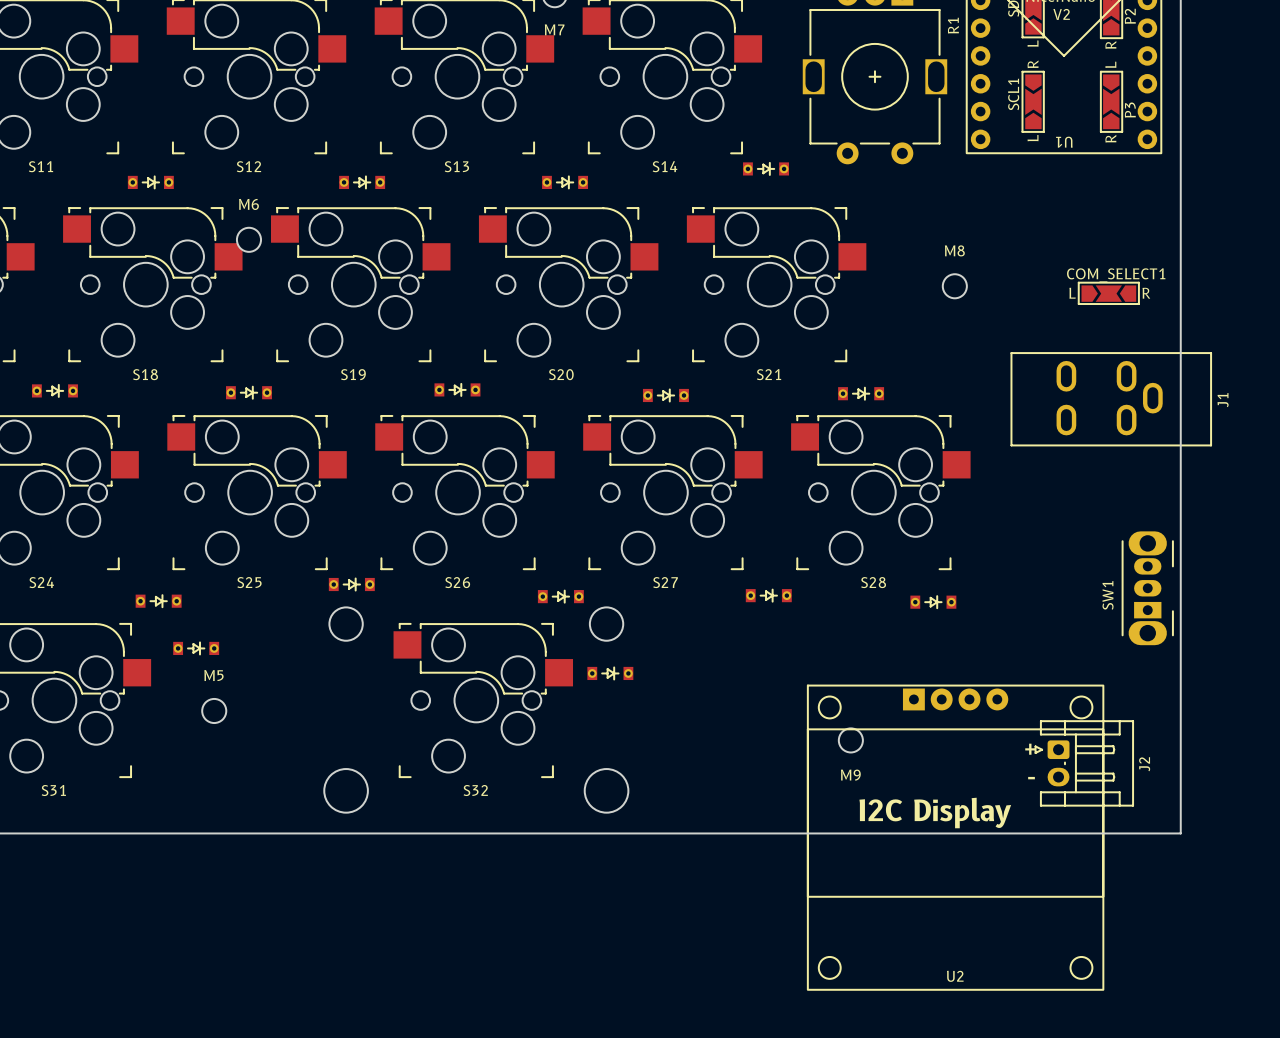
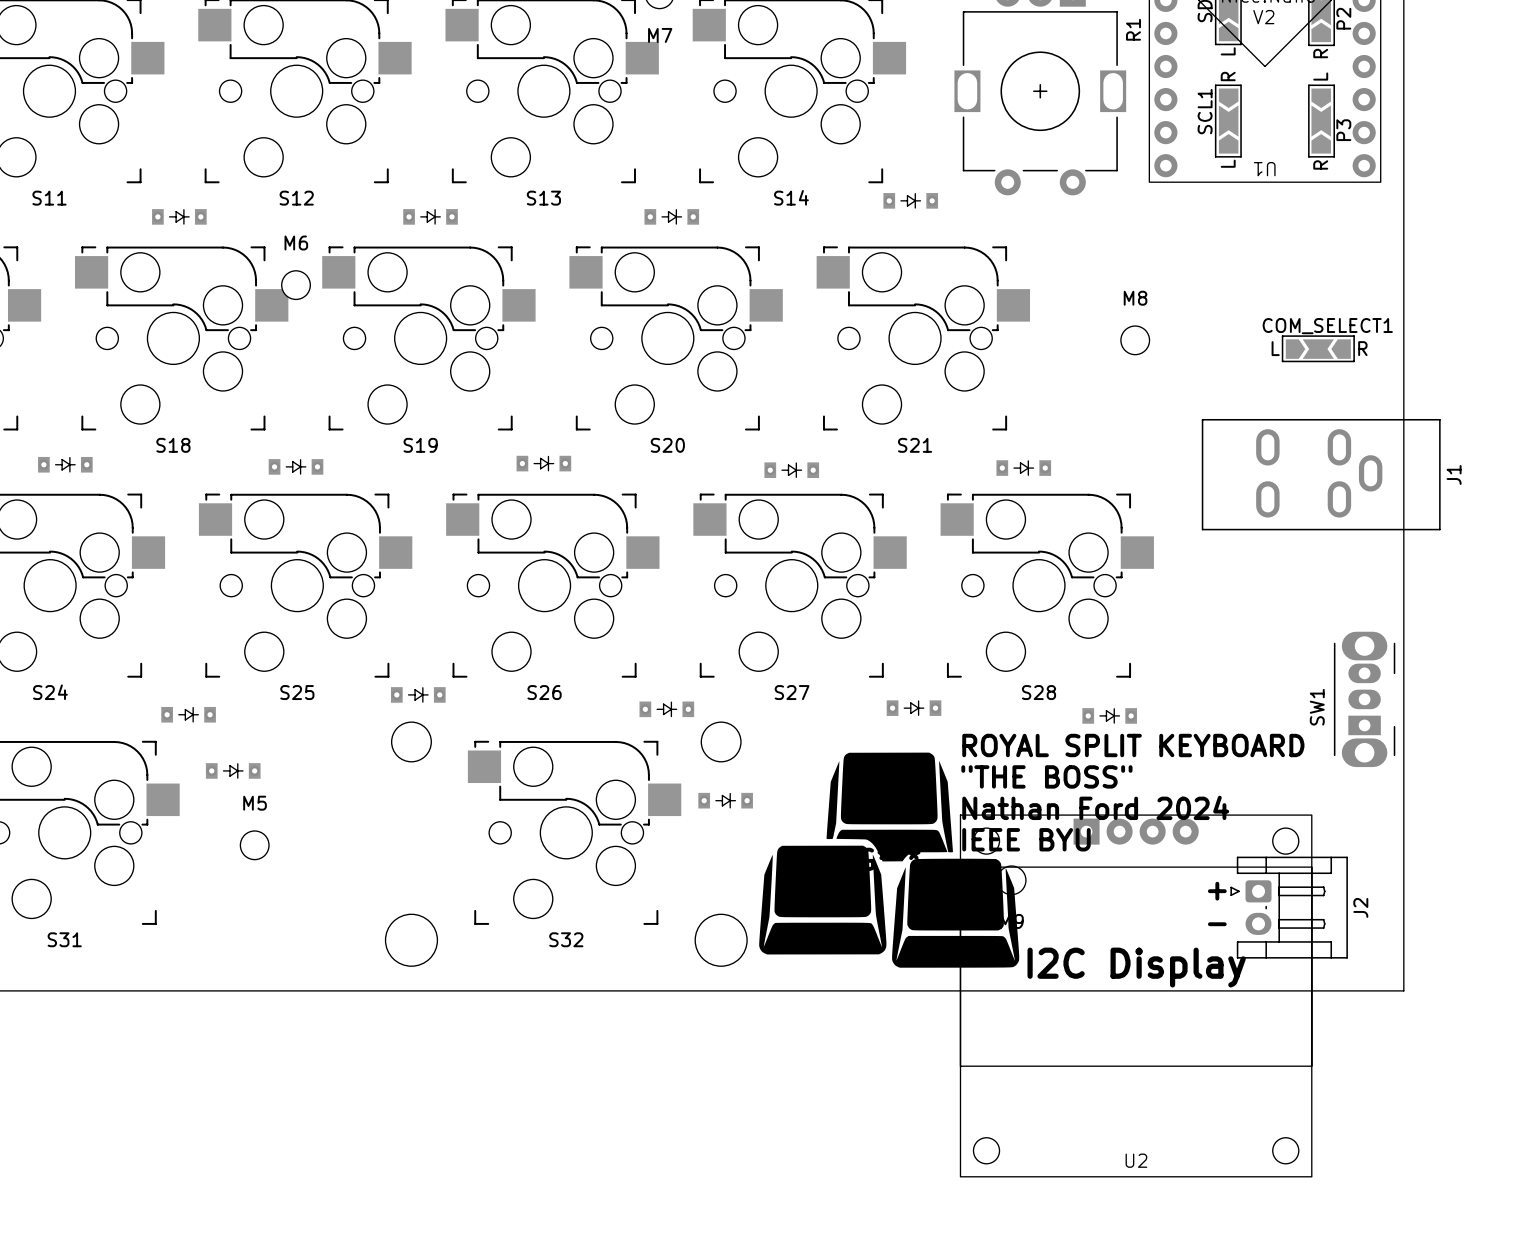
text: none -> ROYAL SPLIT KEYBOARD (1133, 745)
text: none -> "THE BOSS" (1046, 776)
text: none -> Nathan Ford 2024 (1095, 807)
text: none -> IEEE BYU (1026, 839)
part: none -> (889, 860)

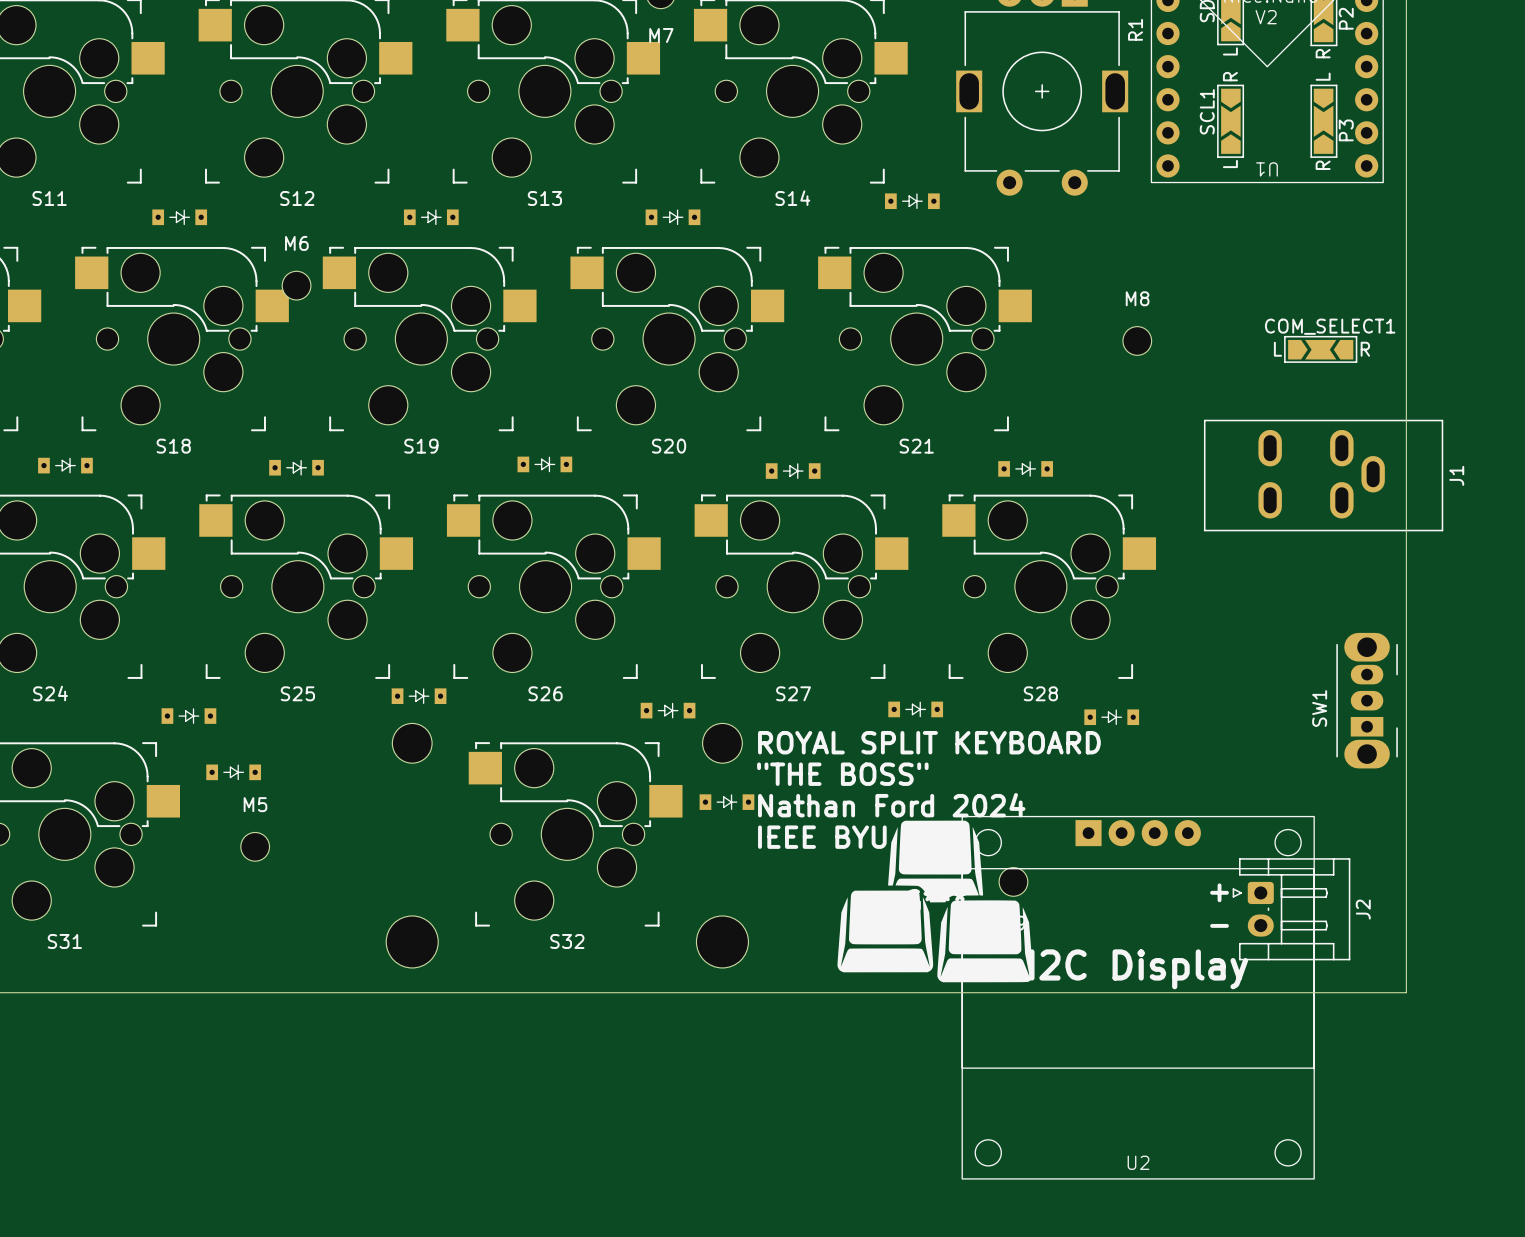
text position: ROYAL SPLIT KEYBOARD (1133, 745) -> ROYAL SPLIT KEYBOARD (929, 742)
text position: "THE BOSS" (1046, 776) -> "THE BOSS" (842, 774)
text position: Nathan Ford 2024 (1095, 807) -> Nathan Ford 2024 (891, 805)
text position: IEEE BYU (1026, 839) -> IEEE BYU (822, 837)
part: (889, 860) -> none
part: none -> (935, 901)

